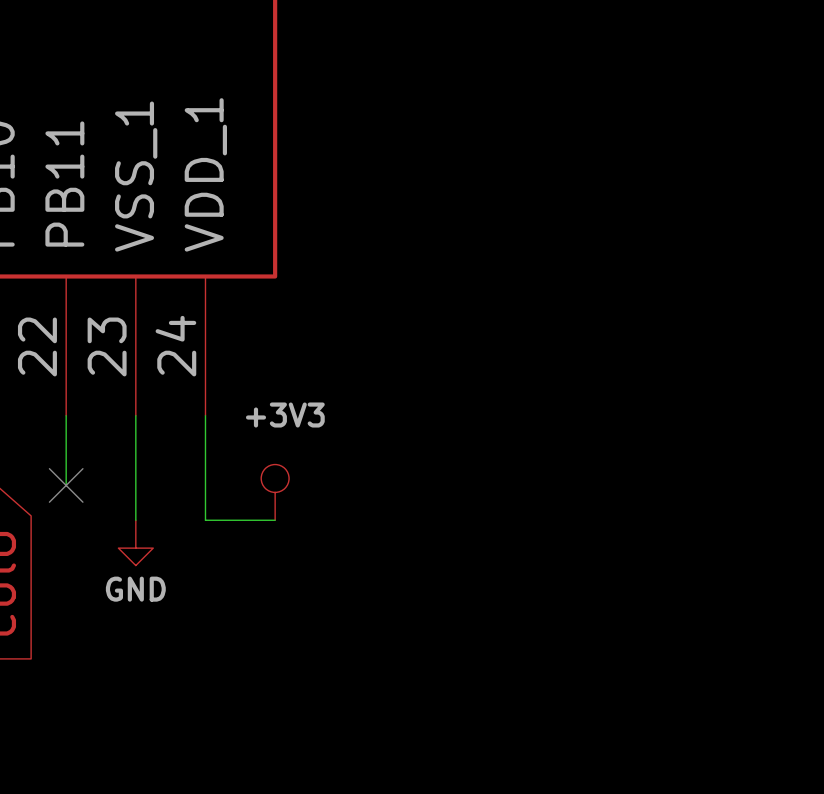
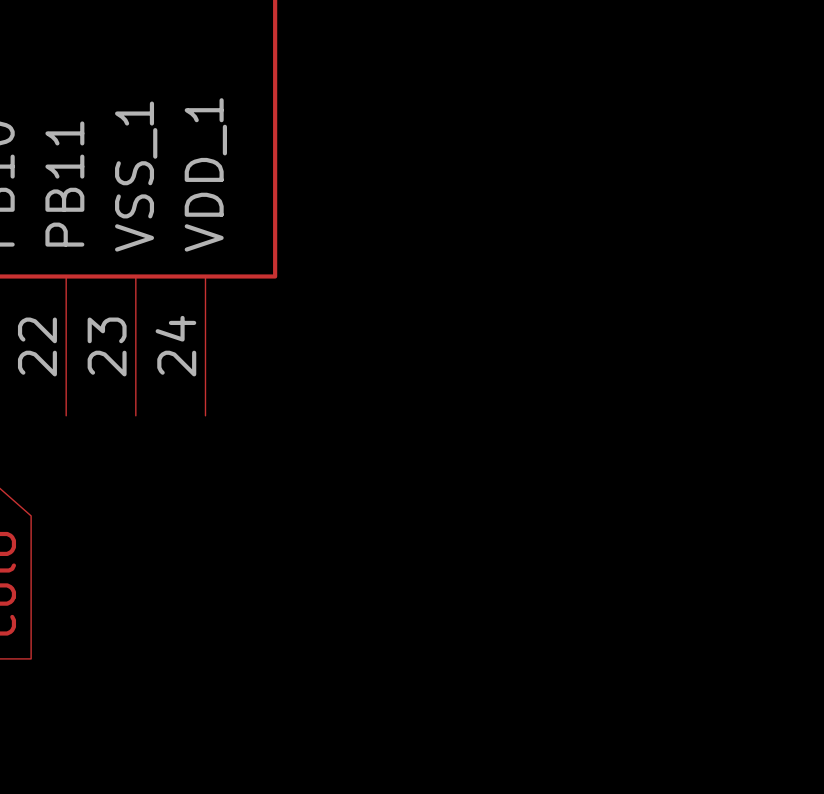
wire: (66, 415) (66, 485) -> none
wire: (135, 415) (135, 520) -> none
wire: (205, 415) (205, 520) (275, 520) -> none
no-connect mark: (66, 485) -> none
power symbol: +3V3 (275, 492) -> none
power symbol: GND (135, 542) -> none

